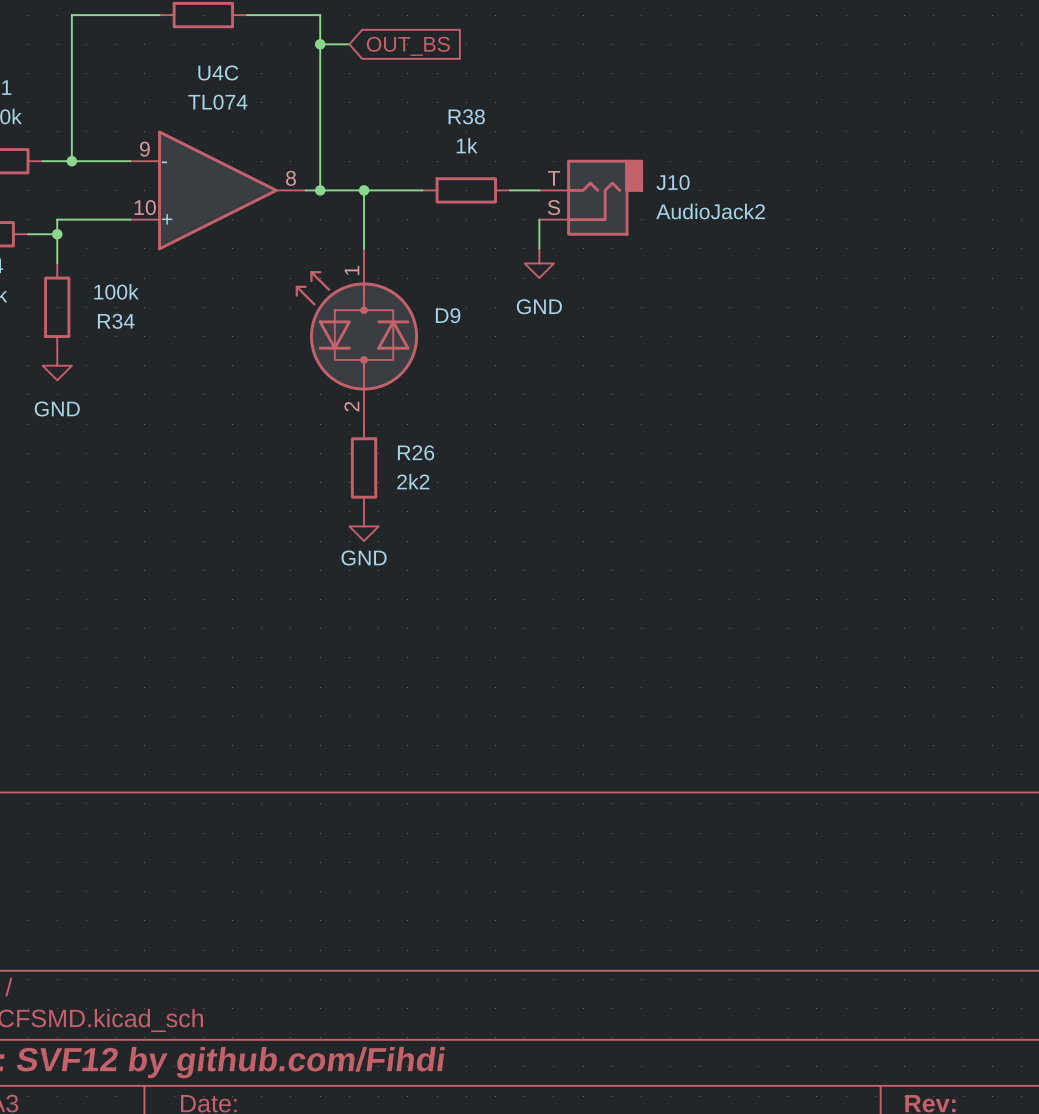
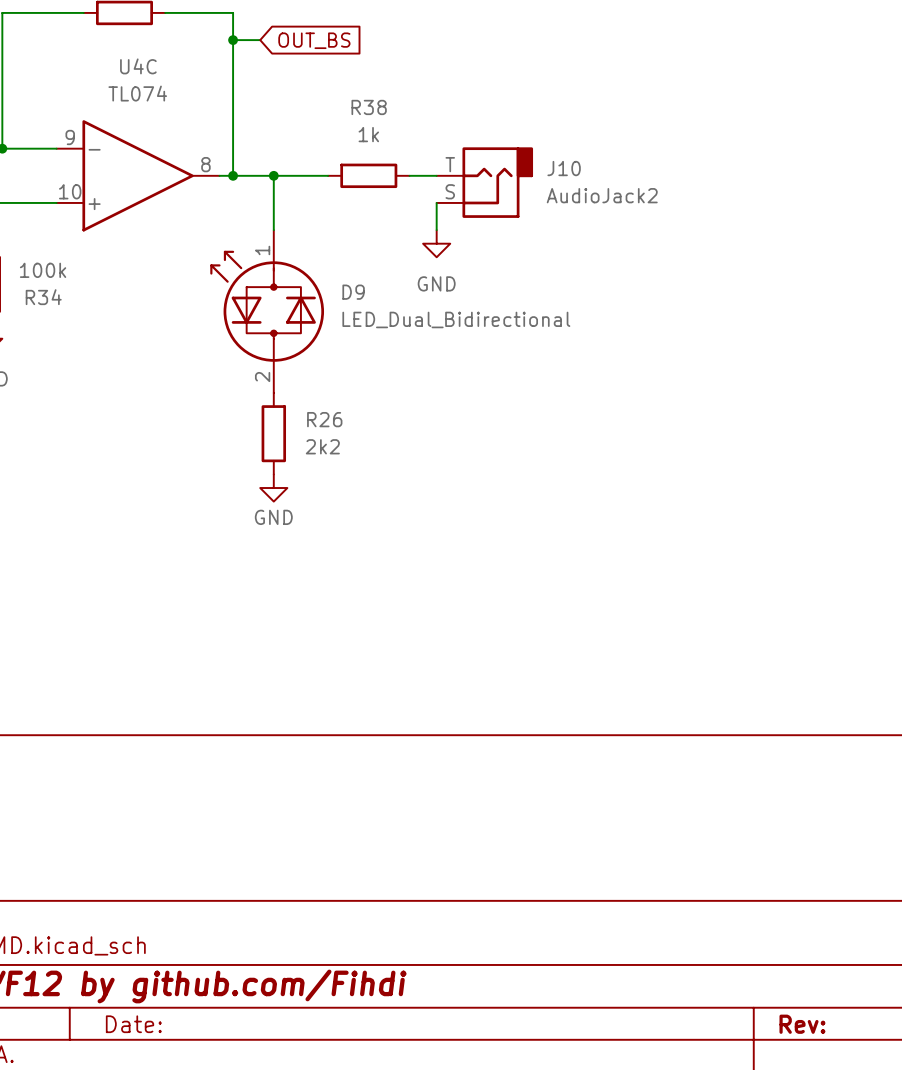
D9 value: none -> LED_Dual_Bidirectional (456, 319)

